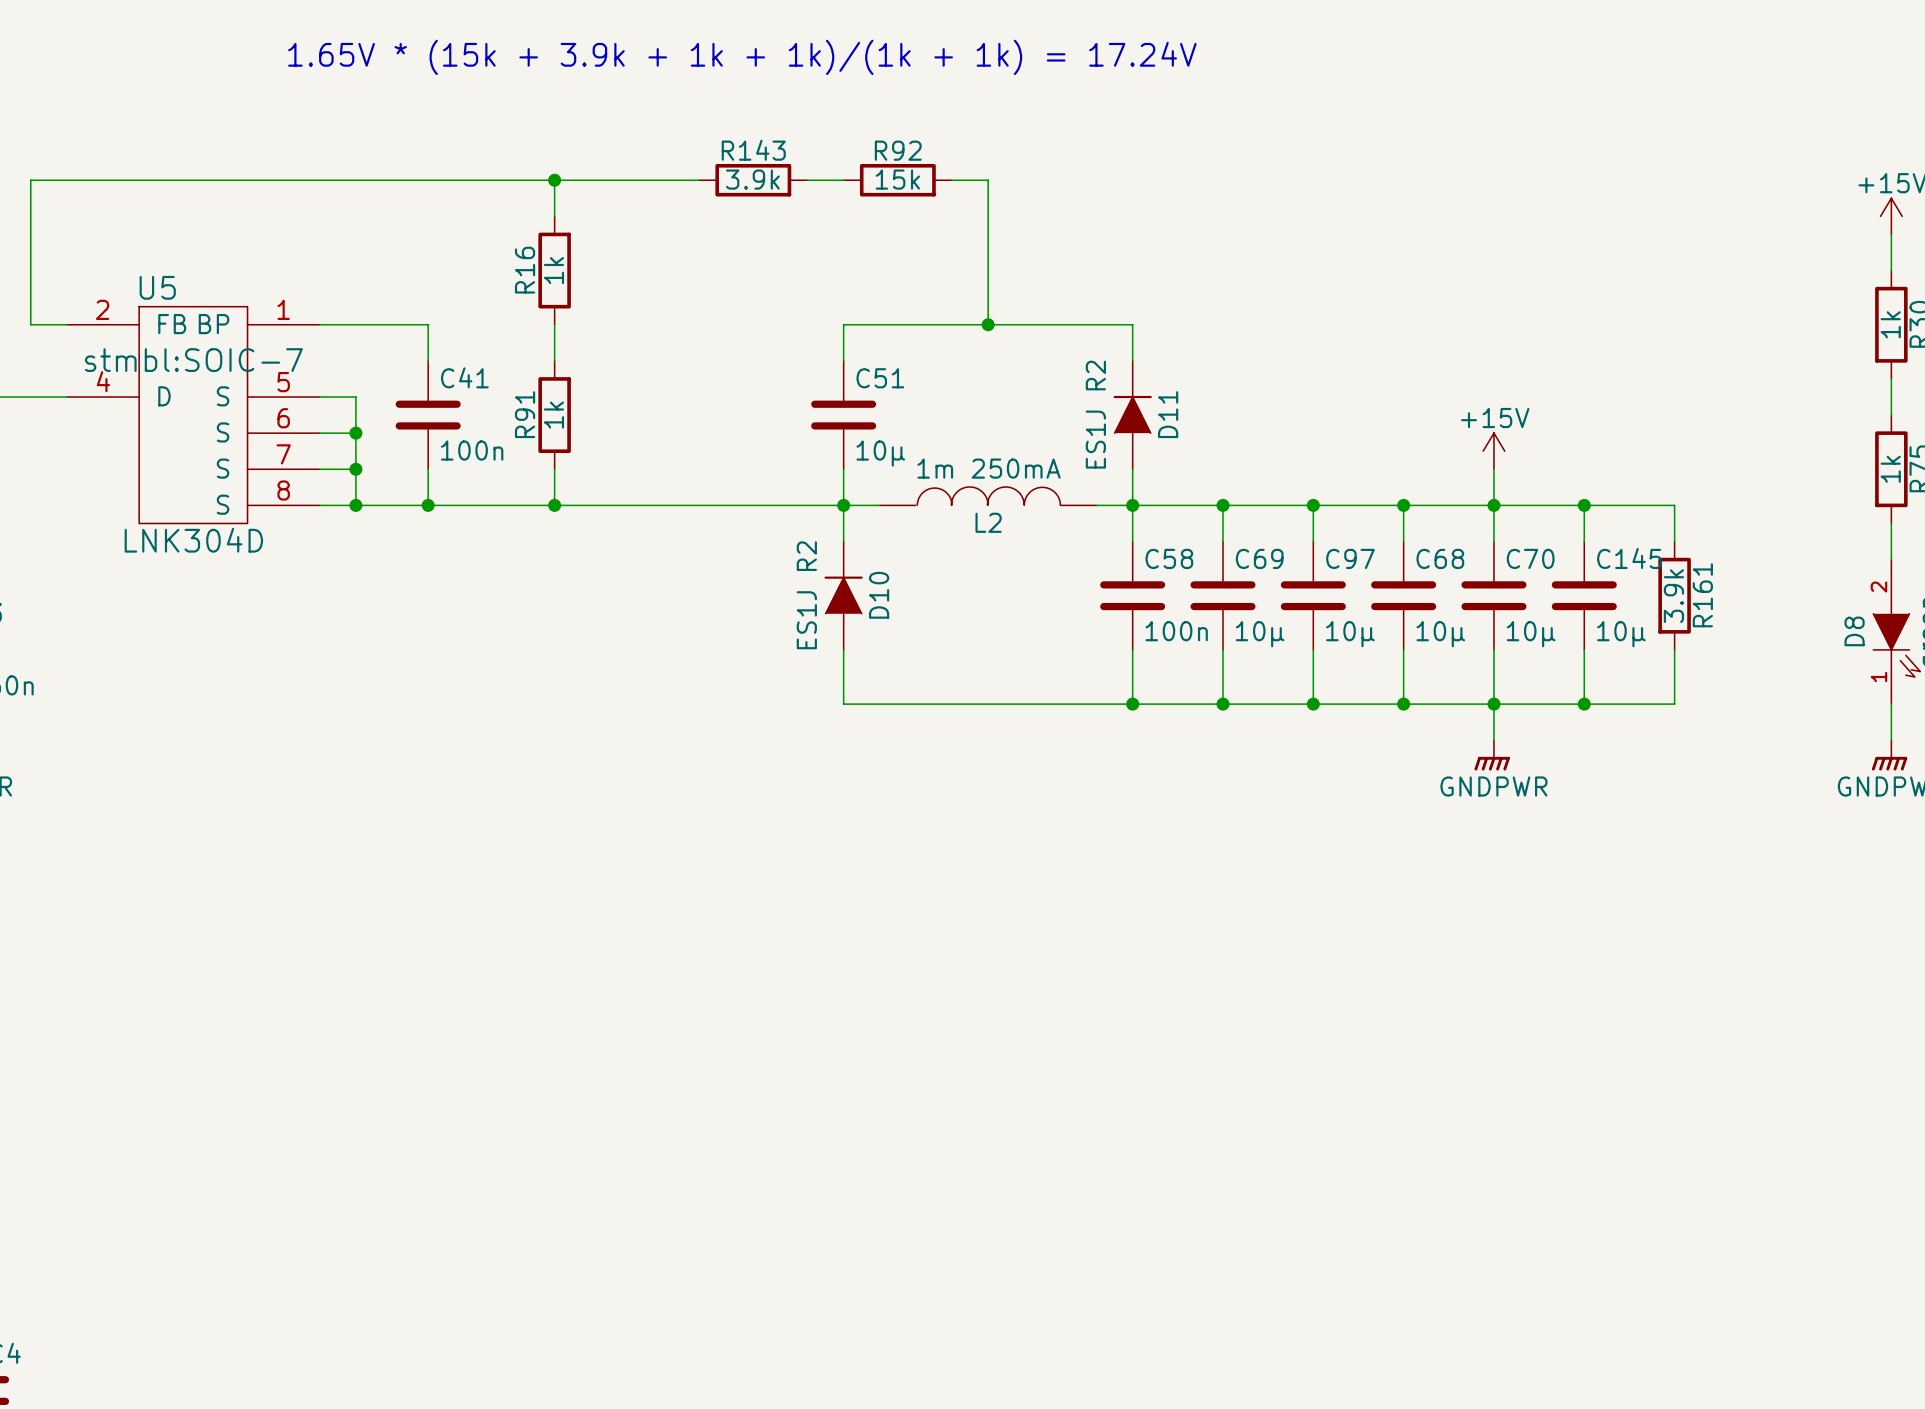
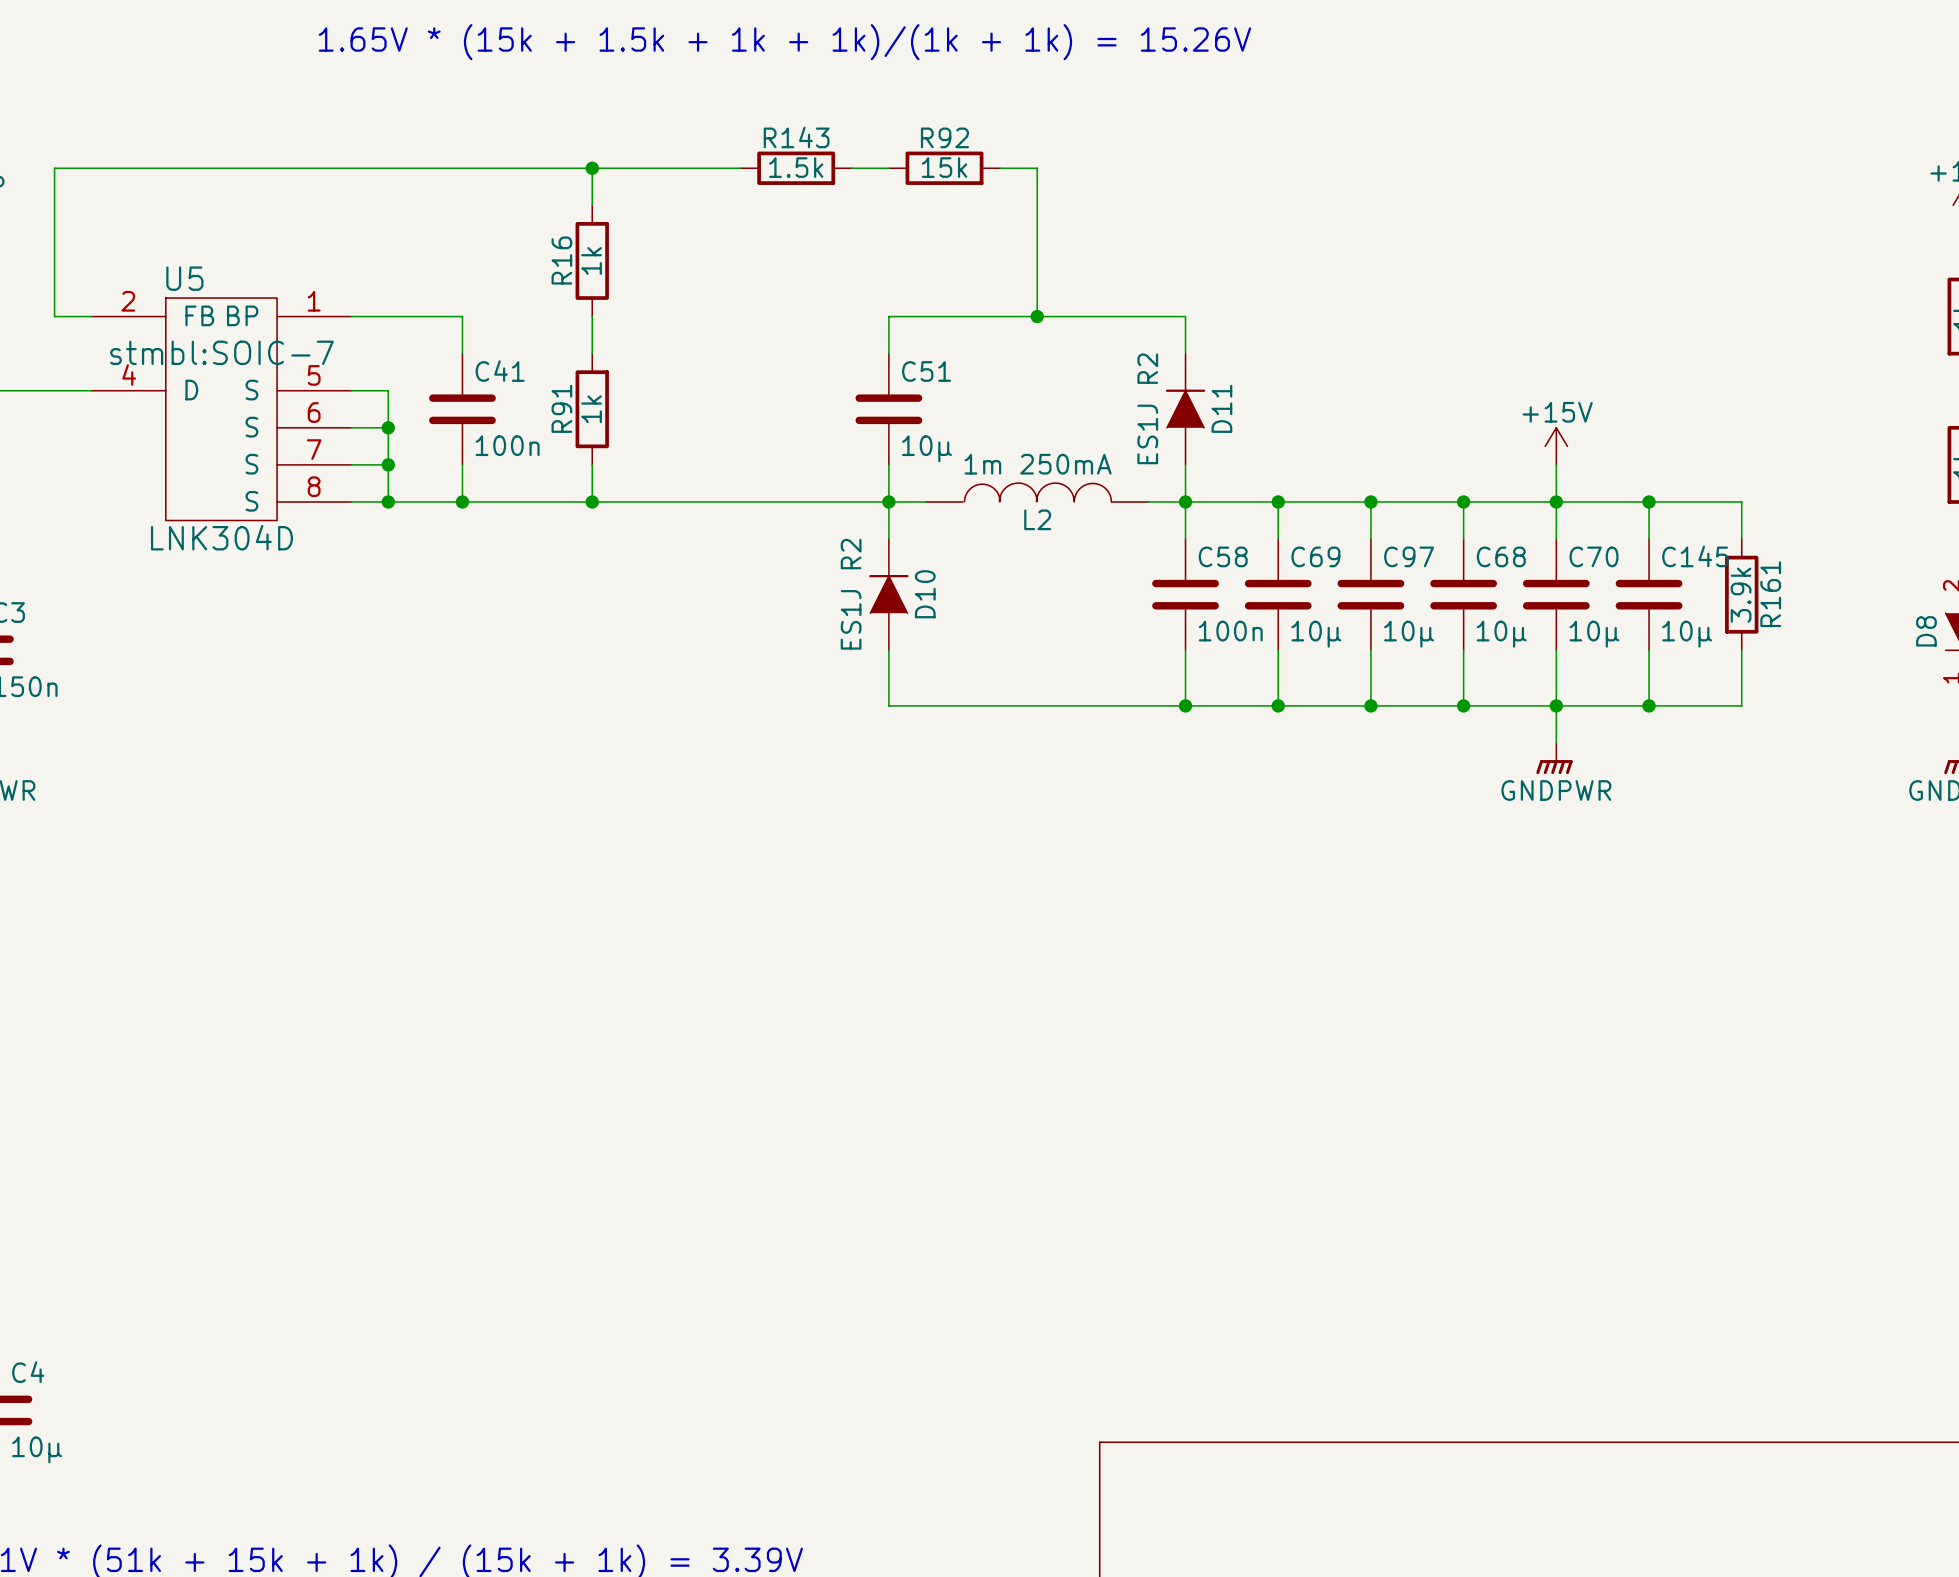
text: 1.65V * (15k + 3.9k + 1k + 1k)/(1k + 1k) = 17.24V (742, 57) -> 1.65V * (15k + 1.5k + 1k + 1k)/(1k + 1k) = 15.26V (784, 42)
R143 value: 3.9k (752, 179) -> 1.5k (796, 167)

